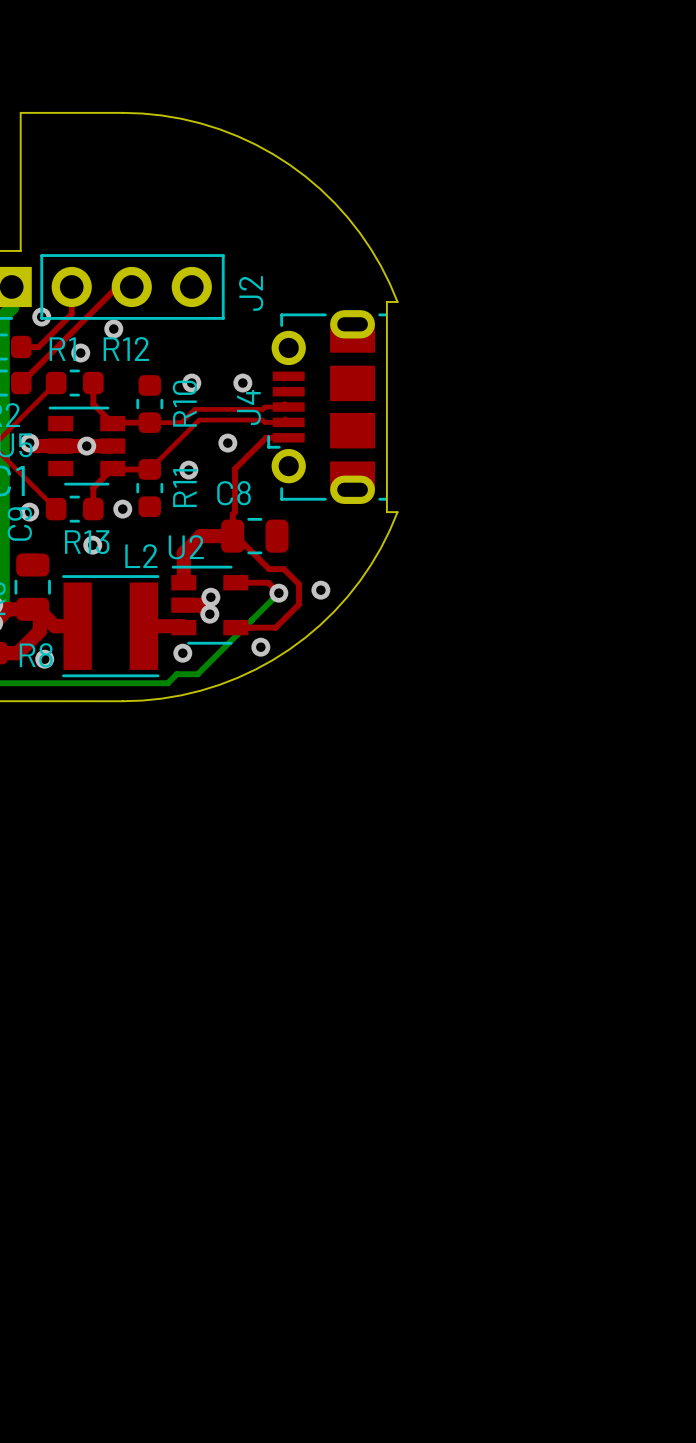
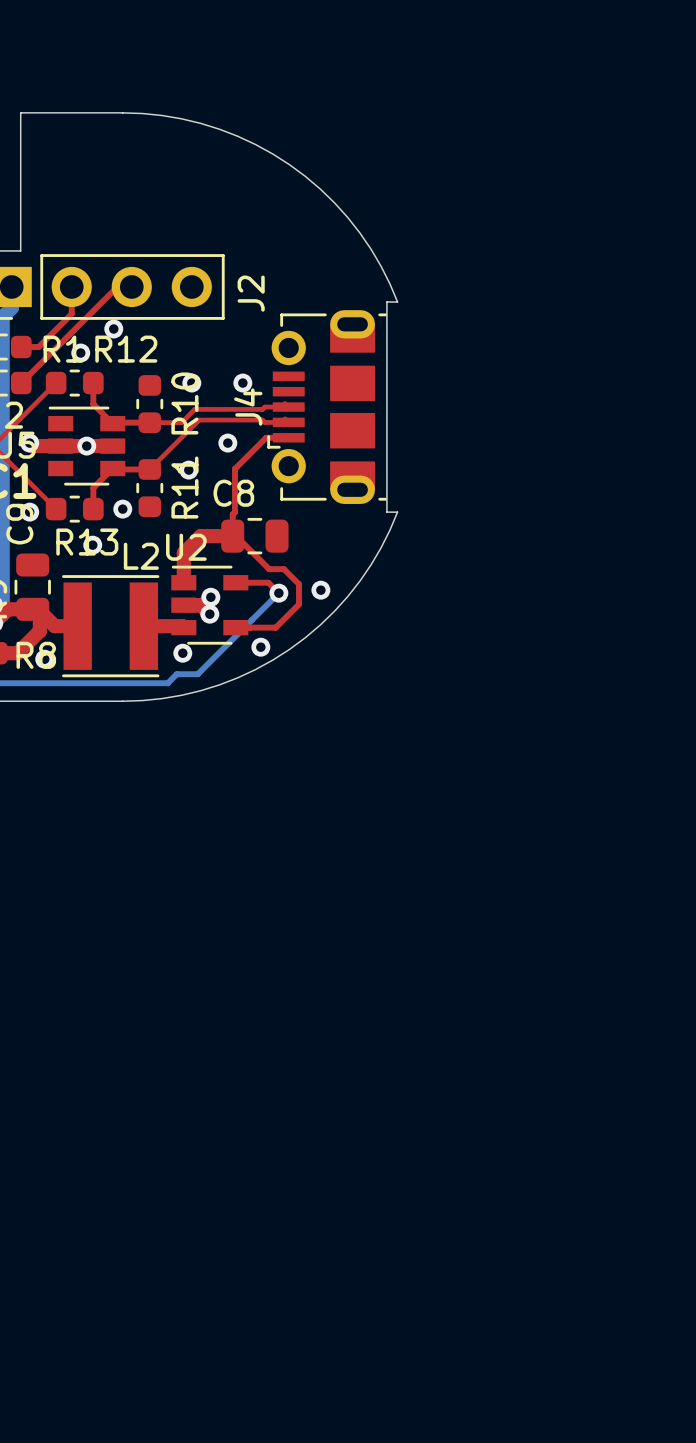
via: (41, 316) -> none

